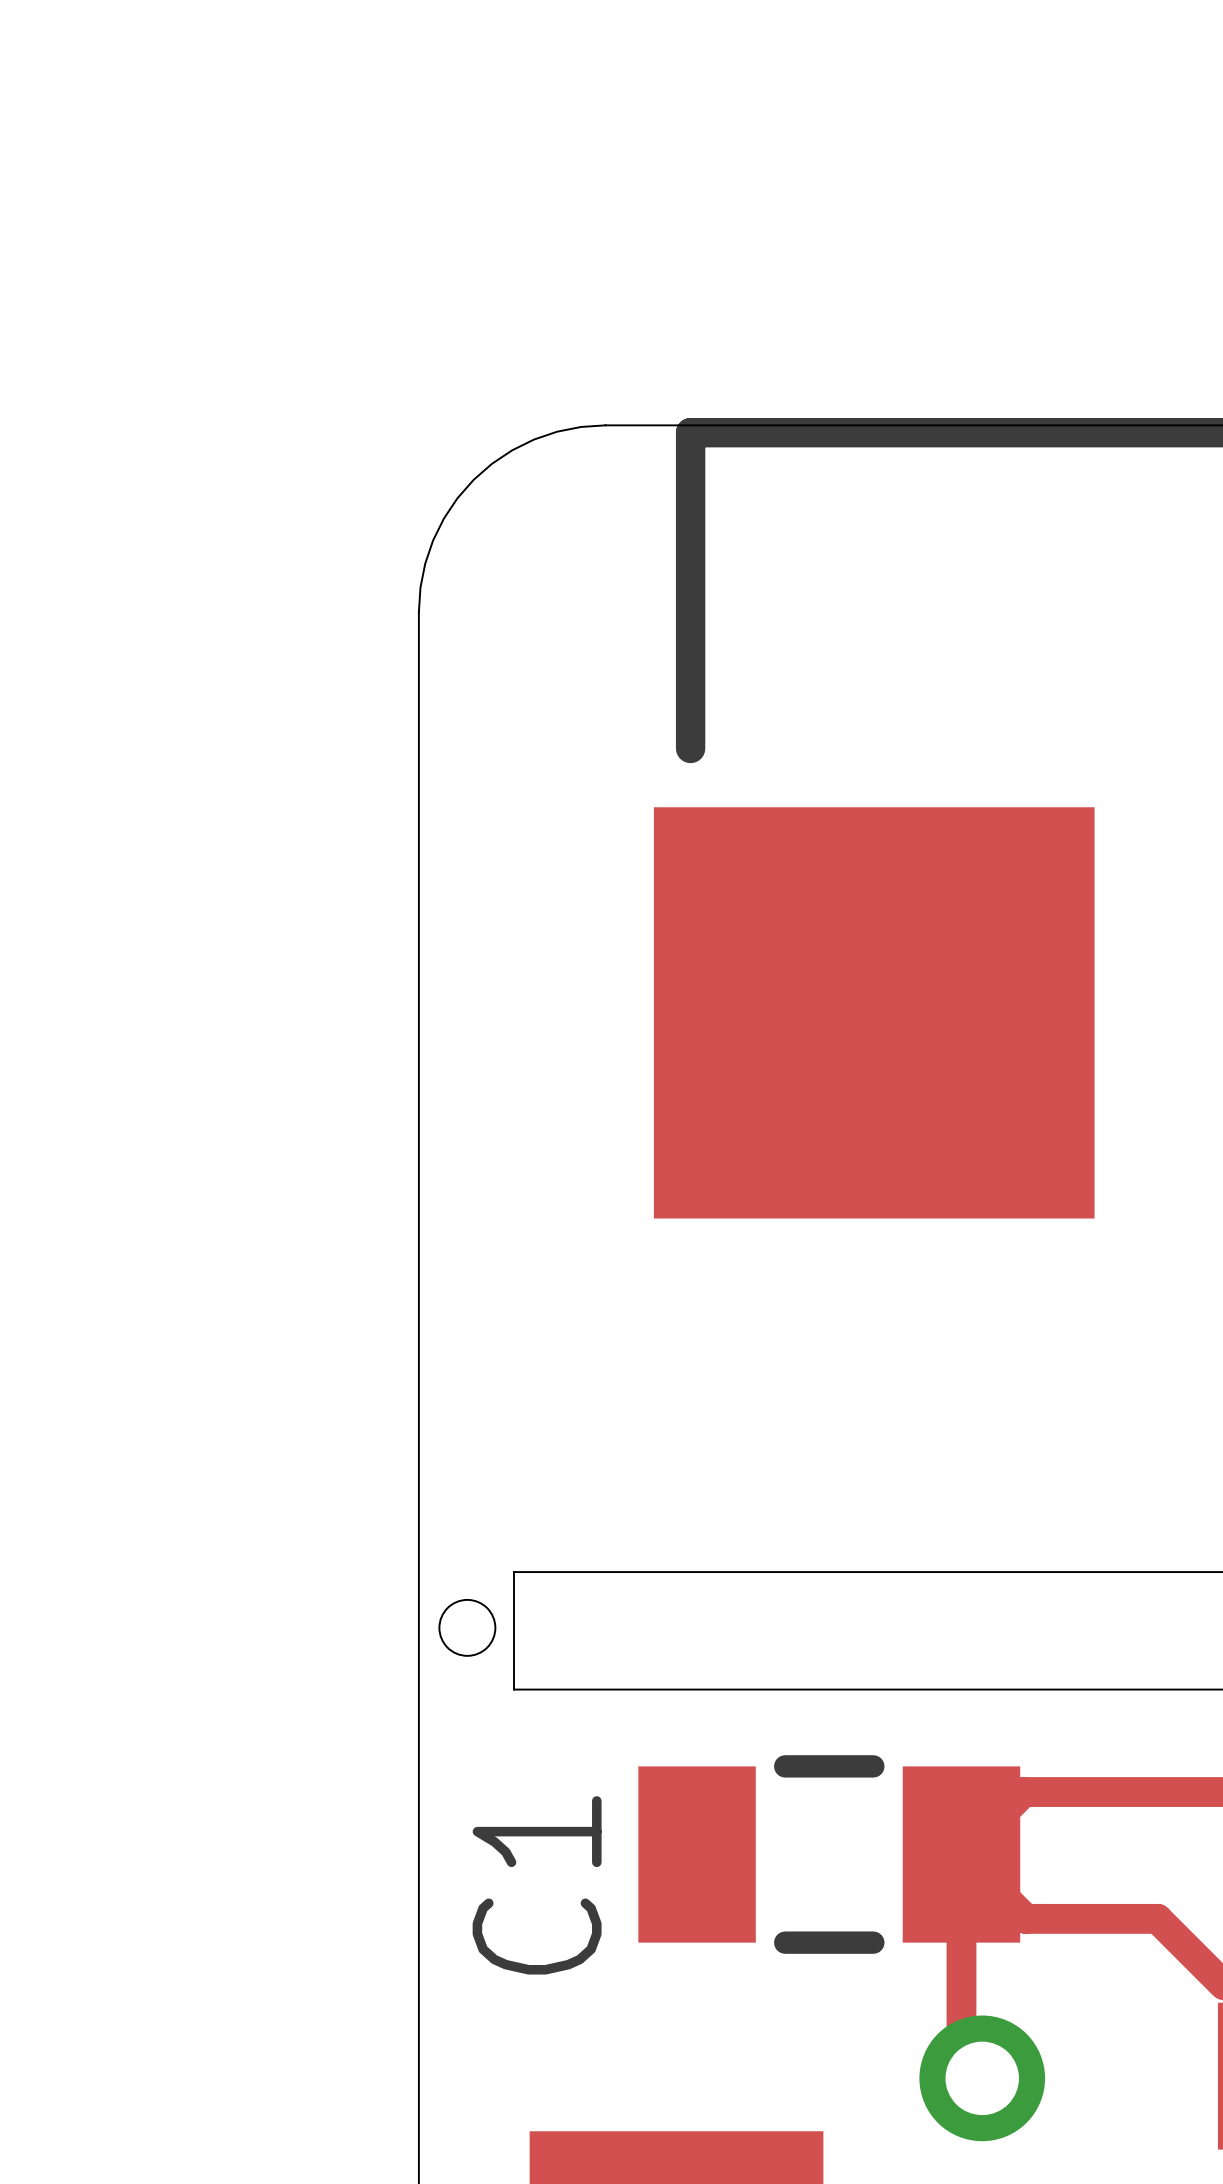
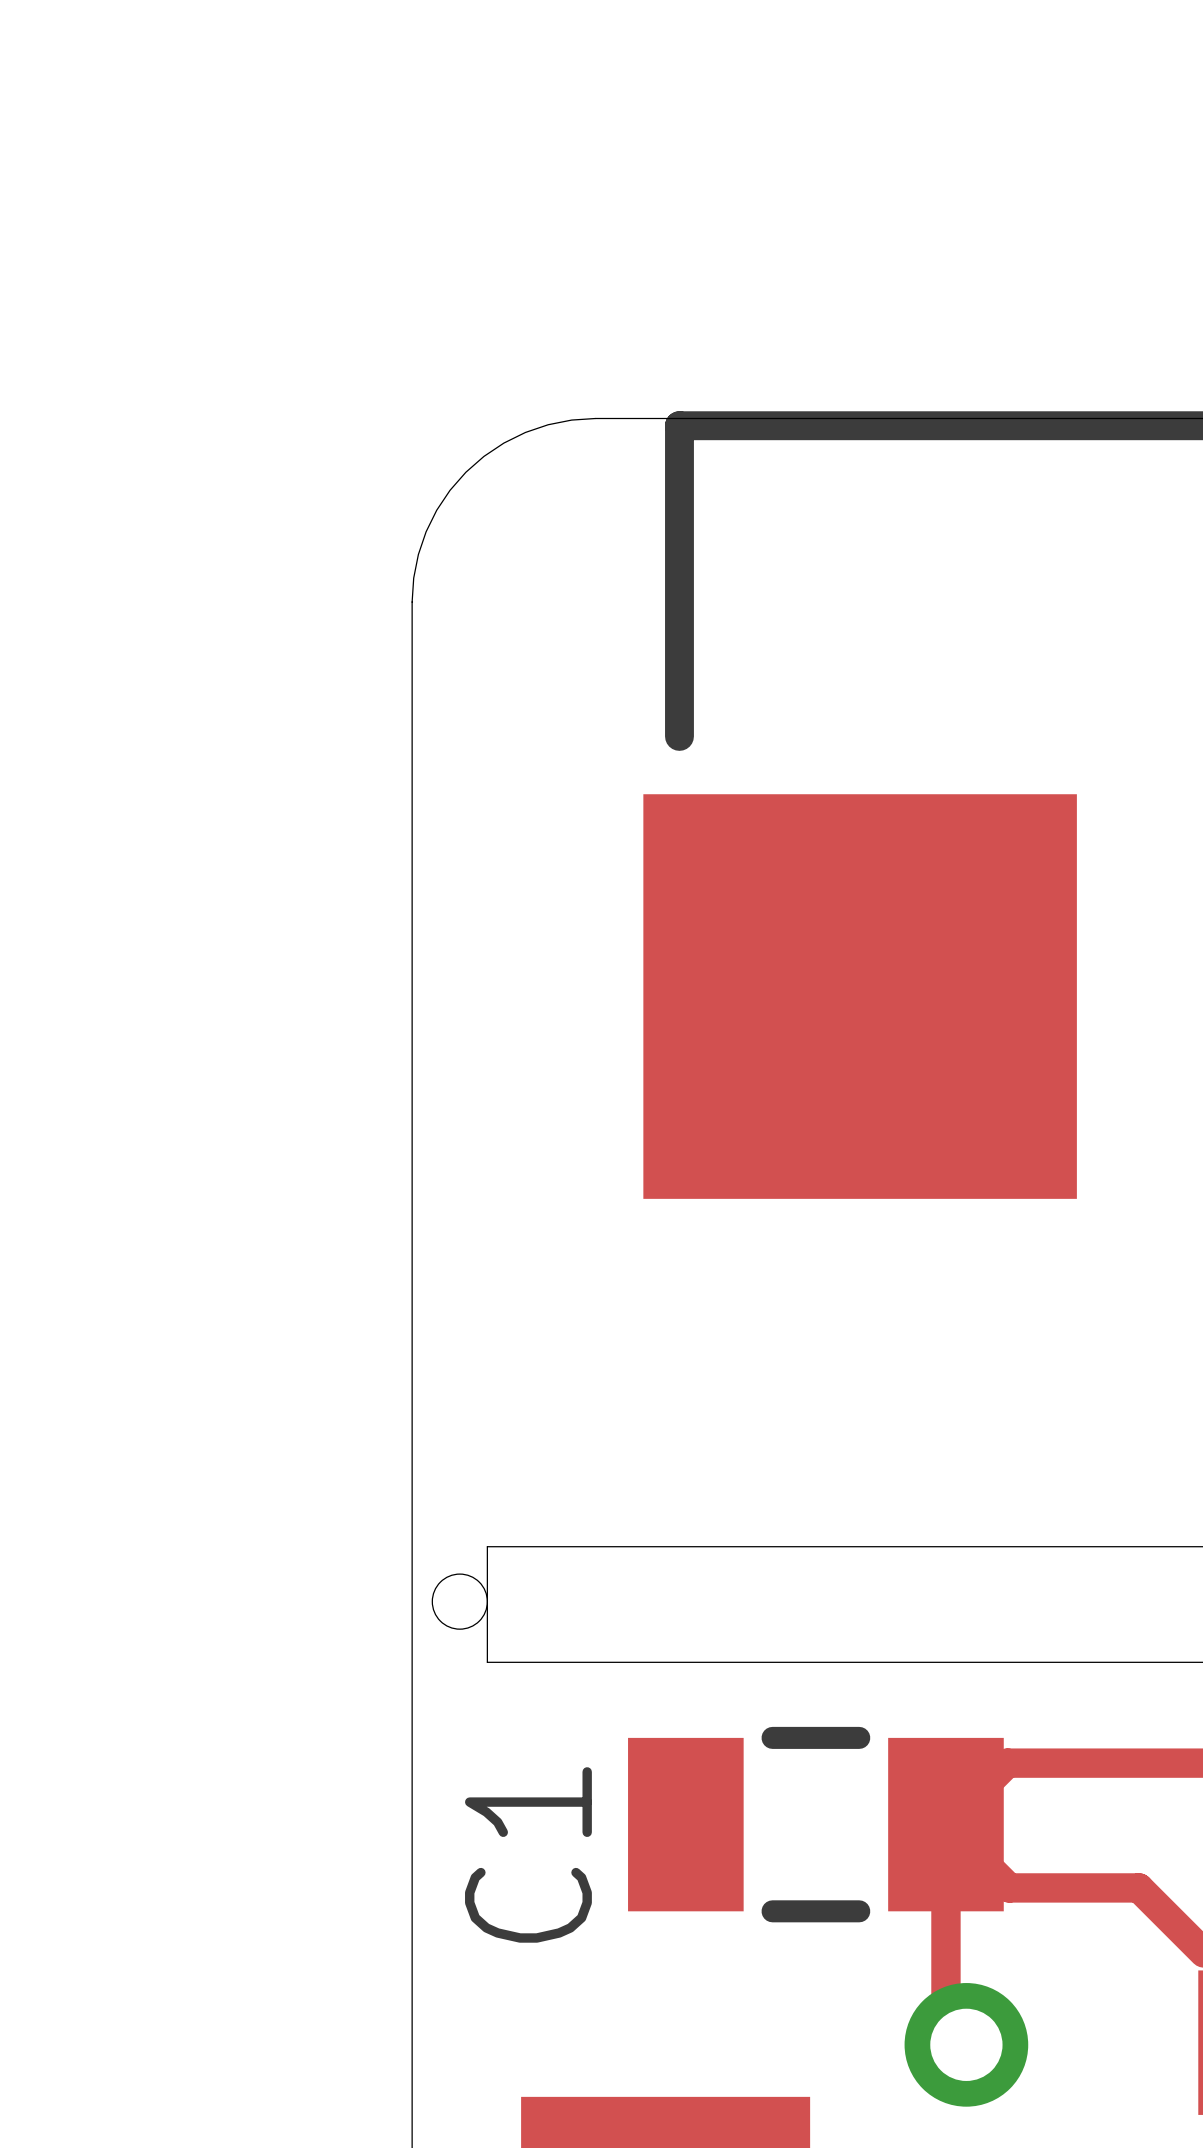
board edge: (514, 1572) (514, 1689) -> (505, 1546) (487, 1546) (487, 1662) (505, 1662)

